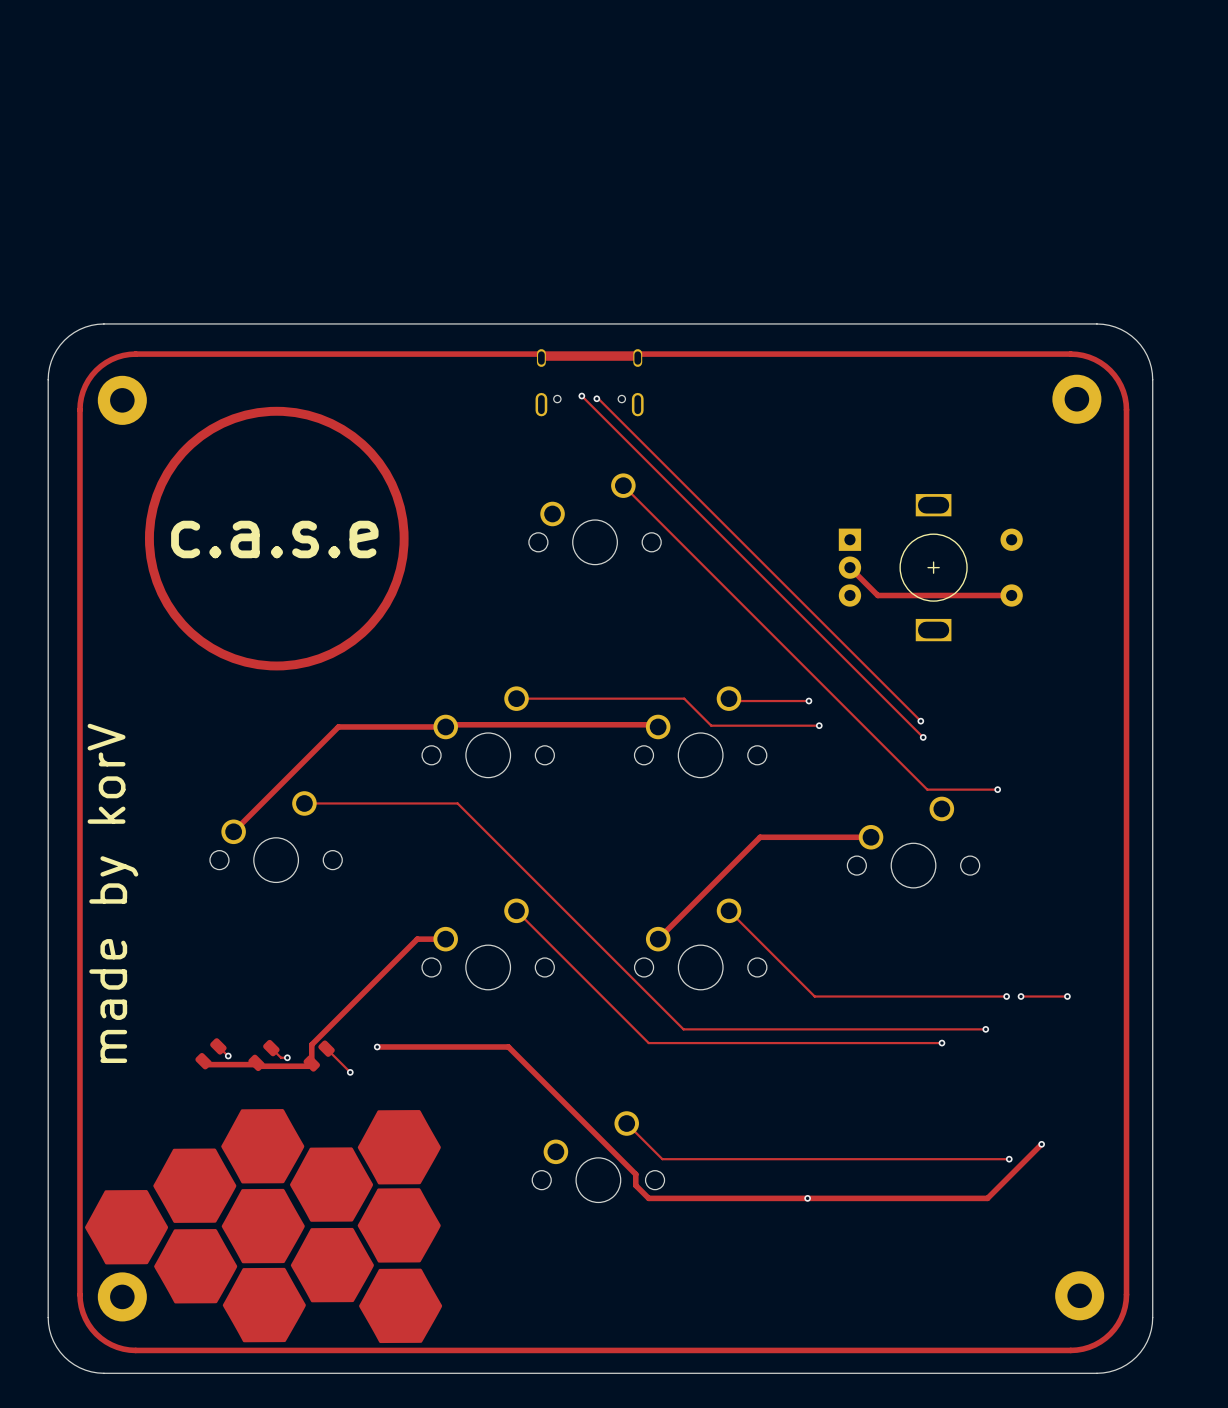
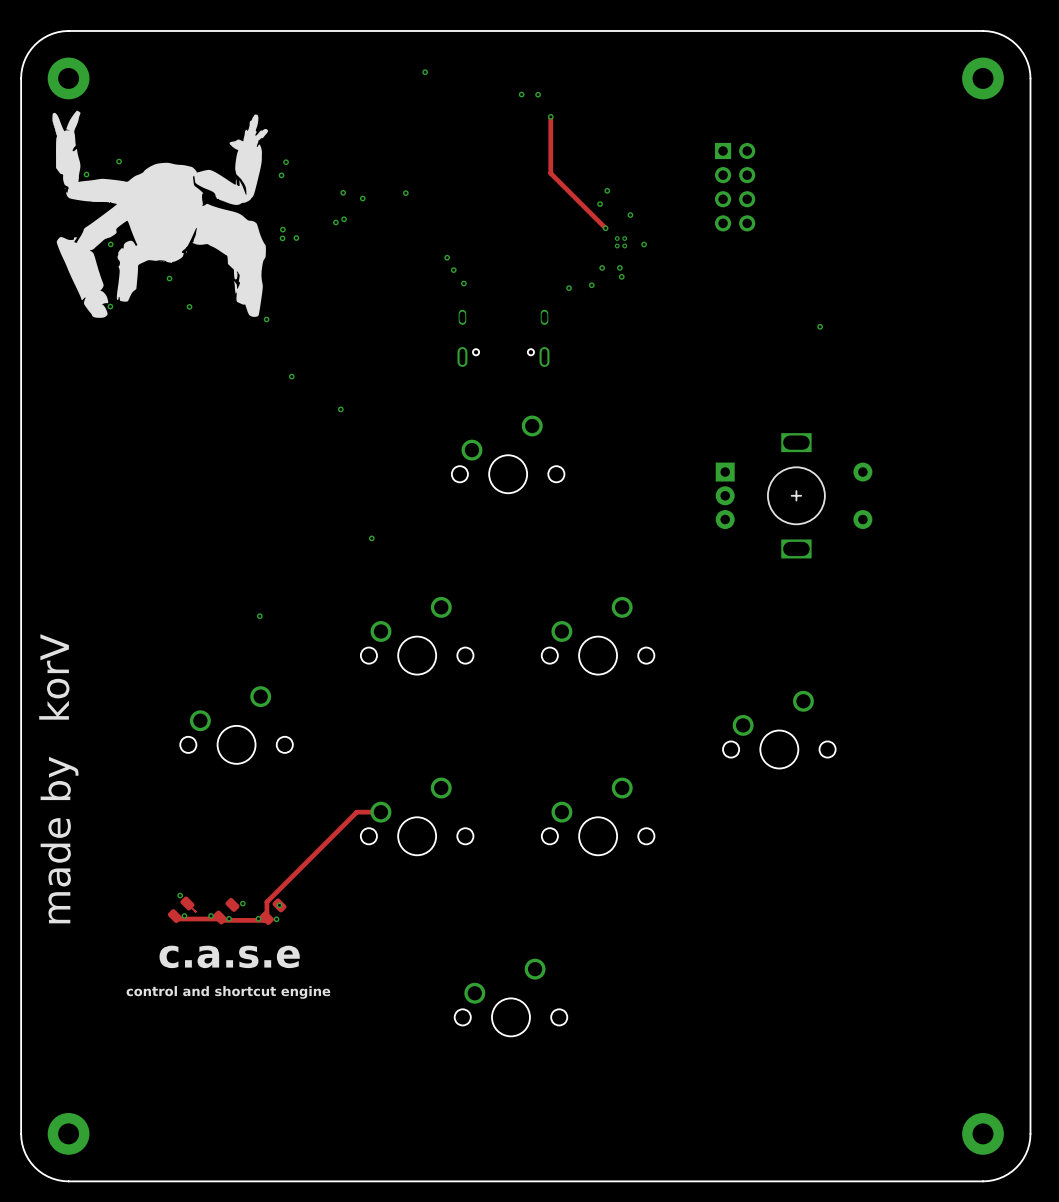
via: none -> (425, 72)
part: none -> (68, 78)
part: none -> (983, 78)
via: none -> (521, 94)
via: none -> (538, 94)
track: none -> (550, 116) (550, 173) (605, 228)
via: none -> (550, 116)
via: none -> (119, 161)
via: none -> (286, 162)
via: none -> (86, 174)
via: none -> (281, 175)
part: none -> (735, 187)
via: none -> (607, 190)
via: none -> (343, 192)
via: none -> (405, 193)
via: none -> (362, 198)
via: none -> (600, 204)
part: none -> (160, 214)
via: none -> (630, 215)
via: none -> (344, 219)
via: none -> (335, 222)
via: none -> (605, 228)
via: none -> (282, 229)
via: none -> (296, 238)
via: none -> (282, 238)
part: none -> (620, 242)
via: none -> (110, 244)
via: none -> (644, 244)
via: none -> (447, 257)
via: none -> (602, 267)
via: none -> (619, 267)
via: none -> (453, 270)
via: none -> (621, 276)
via: none -> (169, 278)
via: none -> (463, 283)
via: none -> (591, 285)
board edge: (103, 323) (1096, 323) (1115, 327) (1136, 340) (1149, 361) (1152, 379) (1152, 1317) (1147, 1341) (1136, 1356) (1121, 1367) (1096, 1373) (103, 1373) (85, 1370) (64, 1356) (51, 1335) (48, 1317) (48, 379) (51, 361) (64, 340) (79, 329) (103, 323) -> (68, 30) (47, 35) (35, 44) (25, 57) (21, 78) (21, 1133) (23, 1149) (31, 1163) (47, 1176) (68, 1181) (983, 1181) (998, 1178) (1012, 1171) (1025, 1154) (1030, 1133) (1030, 78) (1027, 62) (1020, 48) (1003, 35) (983, 30) (68, 30)
via: none -> (569, 288)
via: none -> (110, 306)
via: none -> (189, 306)
track: (135, 354) (1070, 354) (1094, 359) (1110, 370) (1120, 385) (1126, 409) (1126, 1294) (1123, 1313) (1110, 1334) (1094, 1344) (1070, 1350) (135, 1350) (111, 1344) (96, 1334) (85, 1318) (79, 1294) (79, 409) (85, 385) (96, 370) (117, 357) (135, 354) -> none
track: (541, 358) (637, 358) -> none
via: none -> (266, 319)
via: none -> (820, 326)
track: (581, 396) (923, 737) -> none
via: (581, 396) -> none
track: (596, 398) (920, 721) -> none
via: (596, 398) -> none
part: (1076, 399) -> none
part: (122, 400) -> none
drawing: [144, 406, 409, 671] -> none
via: none -> (291, 376)
via: none -> (340, 409)
track: (623, 485) (927, 789) (997, 789) -> none
text: c.a.s.e (274, 539) -> none
track: (849, 567) (877, 595) (1011, 595) -> none
via: none -> (371, 538)
track: (516, 698) (684, 698) (711, 725) (819, 725) -> none
track: (728, 698) (731, 701) (808, 701) -> none
via: (808, 701) -> none
via: none -> (259, 616)
via: (920, 721) -> none
via: (819, 725) -> none
track: (658, 726) (655, 724) (338, 726) (233, 831) -> none
via: (923, 737) -> none
text position: korV (106, 773) -> korV (54, 676)
via: (997, 789) -> none
track: (304, 803) (457, 803) (683, 1029) (985, 1029) -> none
track: (871, 837) (760, 837) (658, 939) -> none
track: (516, 910) (648, 1043) (941, 1043) -> none
track: (729, 910) (814, 996) (1006, 996) -> none
text position: made by (113, 959) -> made by (59, 840)
via: (1006, 996) -> none
track: (1021, 996) (1067, 996) -> none
via: (1021, 996) -> none
via: (1067, 996) -> none
via: (985, 1029) -> none
via: none -> (180, 895)
via: (941, 1043) -> none
via: none -> (242, 903)
track: (377, 1046) (508, 1046) (635, 1174) (635, 1185) (648, 1198) (987, 1198) (1041, 1144) -> none
via: (377, 1046) -> none
track: (271, 1048) (281, 1057) (287, 1057) -> none
track: (326, 1048) (350, 1072) -> none
via: none -> (279, 905)
via: (228, 1056) -> none
via: (287, 1057) -> none
via: none -> (184, 915)
via: none -> (211, 915)
via: none -> (229, 918)
via: none -> (258, 918)
via: none -> (276, 919)
via: (350, 1072) -> none
drawing: [84, 1109, 443, 1344] -> none
text: none -> c.a.s.e (229, 956)
track: (626, 1123) (662, 1159) (1009, 1159) -> none
via: (1041, 1144) -> none
text: none -> control and shortcut engine (228, 992)
via: (1009, 1159) -> none
via: (807, 1198) -> none
part position: (1079, 1295) -> (983, 1133)
part position: (122, 1296) -> (68, 1133)

